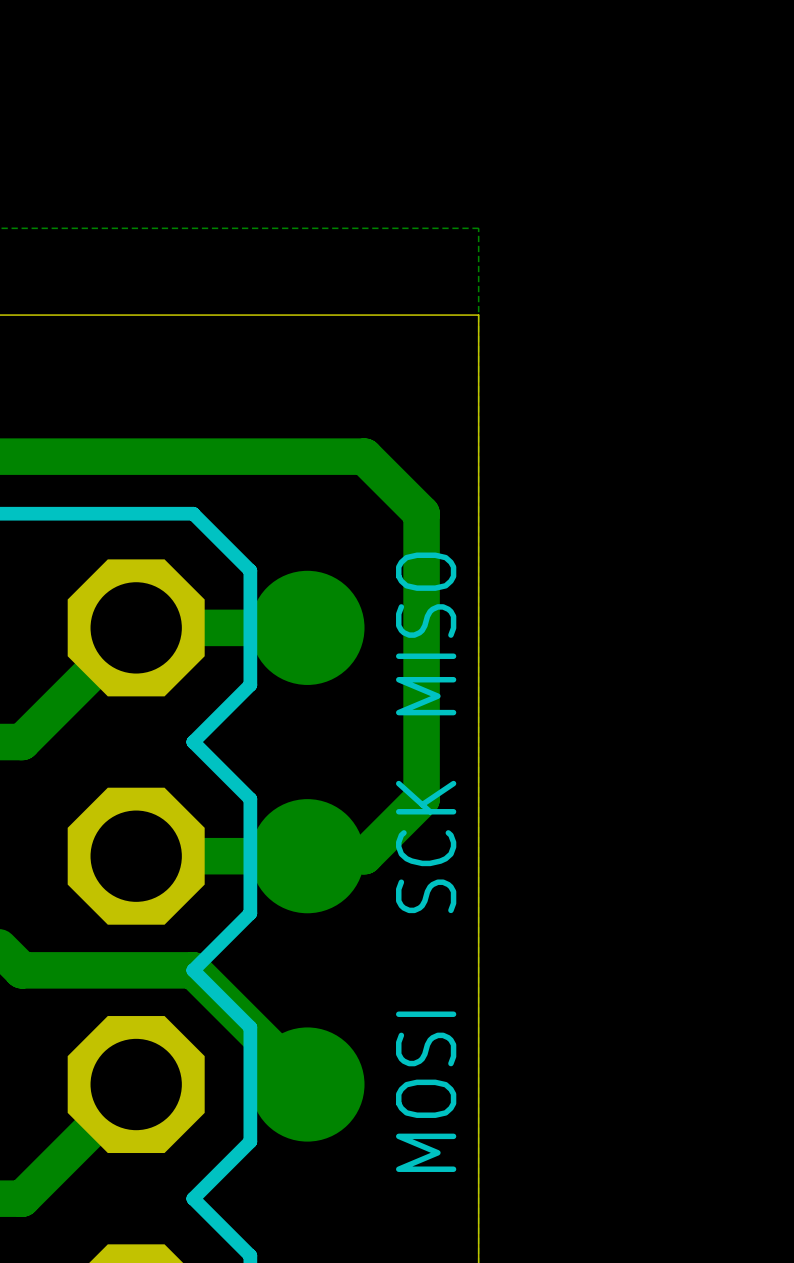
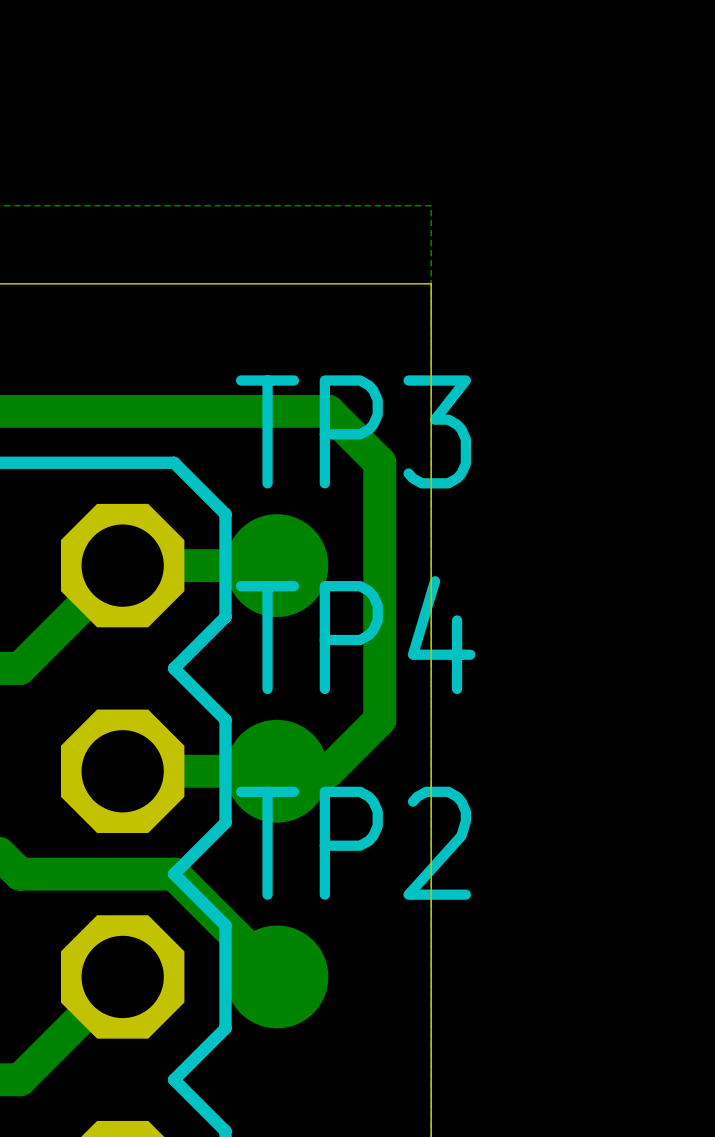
MISO name: MISO (426, 633) -> TP3 (353, 431)
SCK name: SCK (426, 846) -> TP4 (355, 635)
MOSI name: MOSI (426, 1091) -> TP2 (353, 843)

